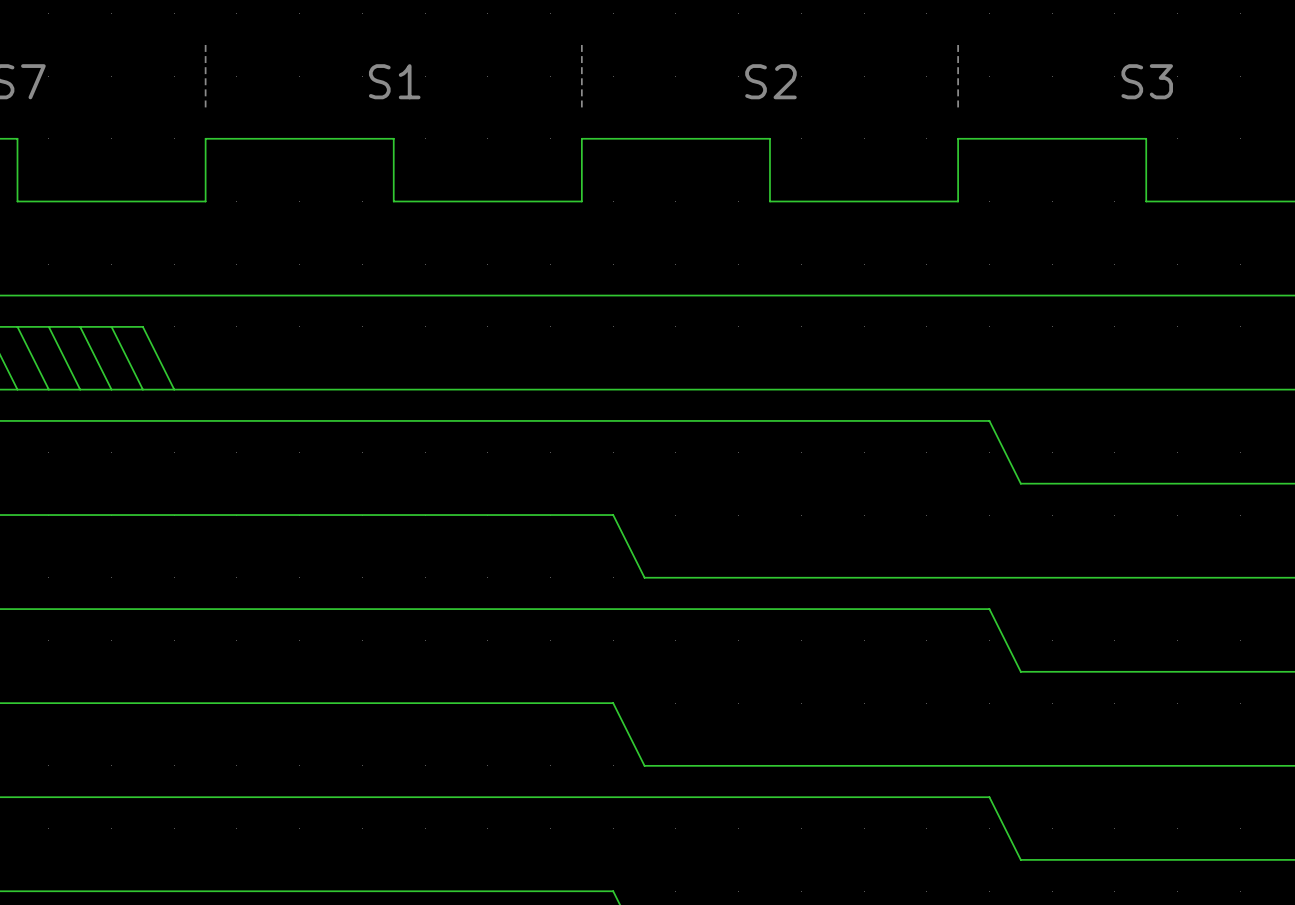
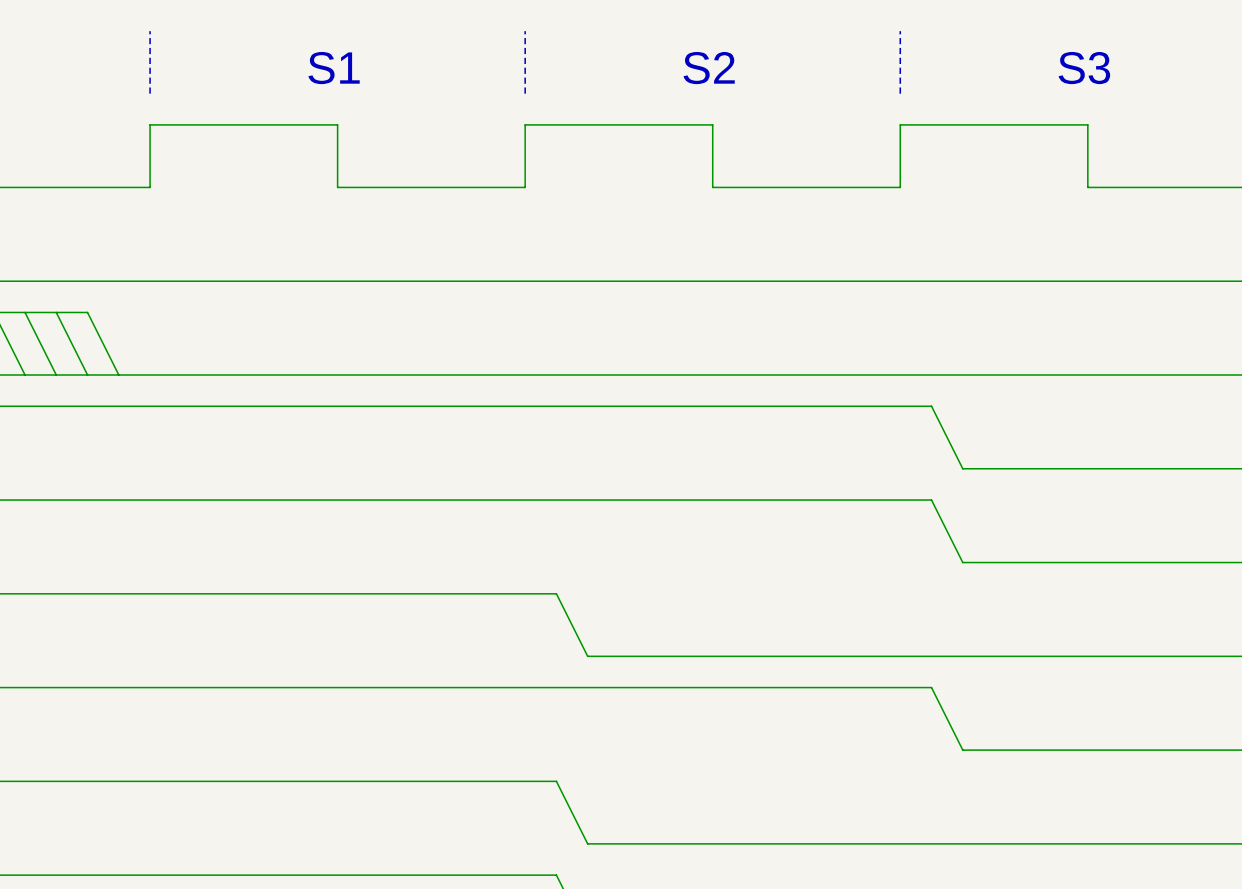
wire: (613, 515) (644, 577) (1020, 577) -> (556, 500) (931, 500) (962, 562)
wire: (613, 609) (989, 609) (1020, 671) -> (556, 593) (587, 656) (962, 656)
wire: (613, 703) (644, 765) (1020, 765) -> (556, 687) (931, 687) (962, 750)
wire: (613, 797) (989, 797) (1020, 859) -> (556, 781) (587, 843) (962, 843)

